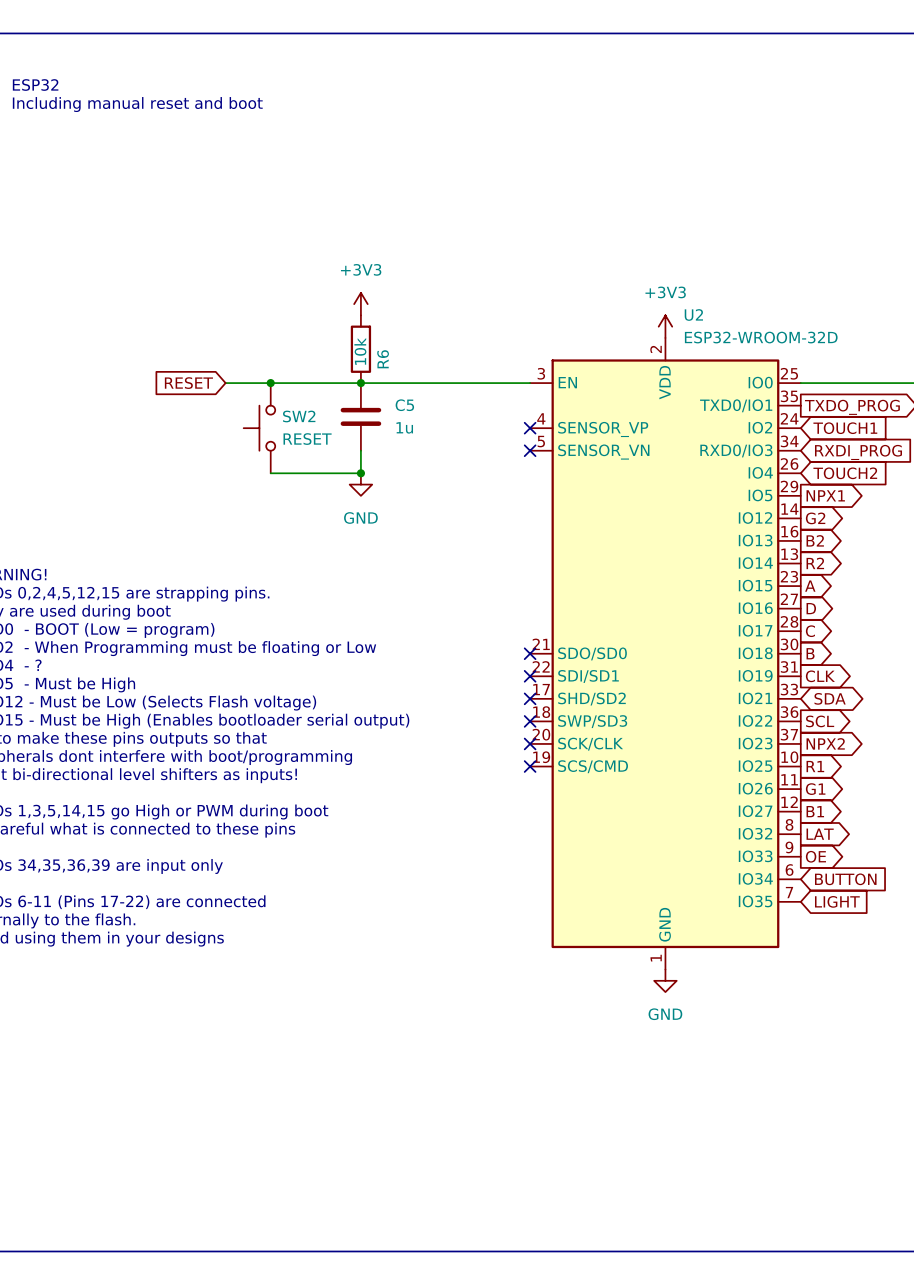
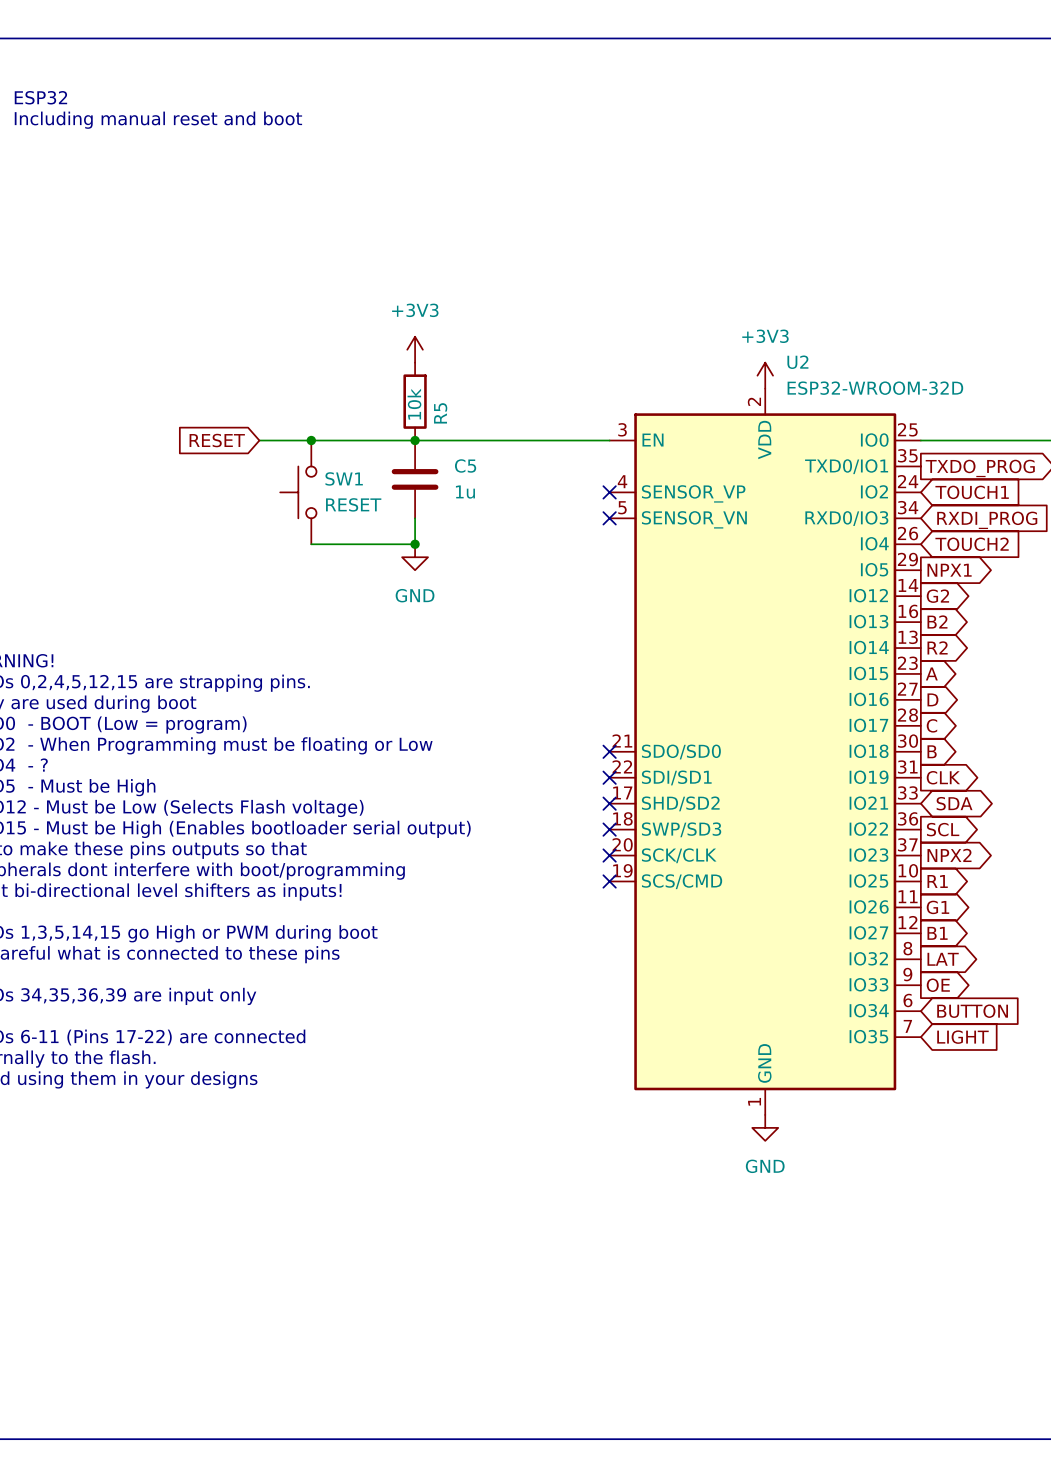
R6 name: R6 (383, 359) -> R5 (440, 413)
SW2 name: SW2 (299, 416) -> SW1 (344, 478)

